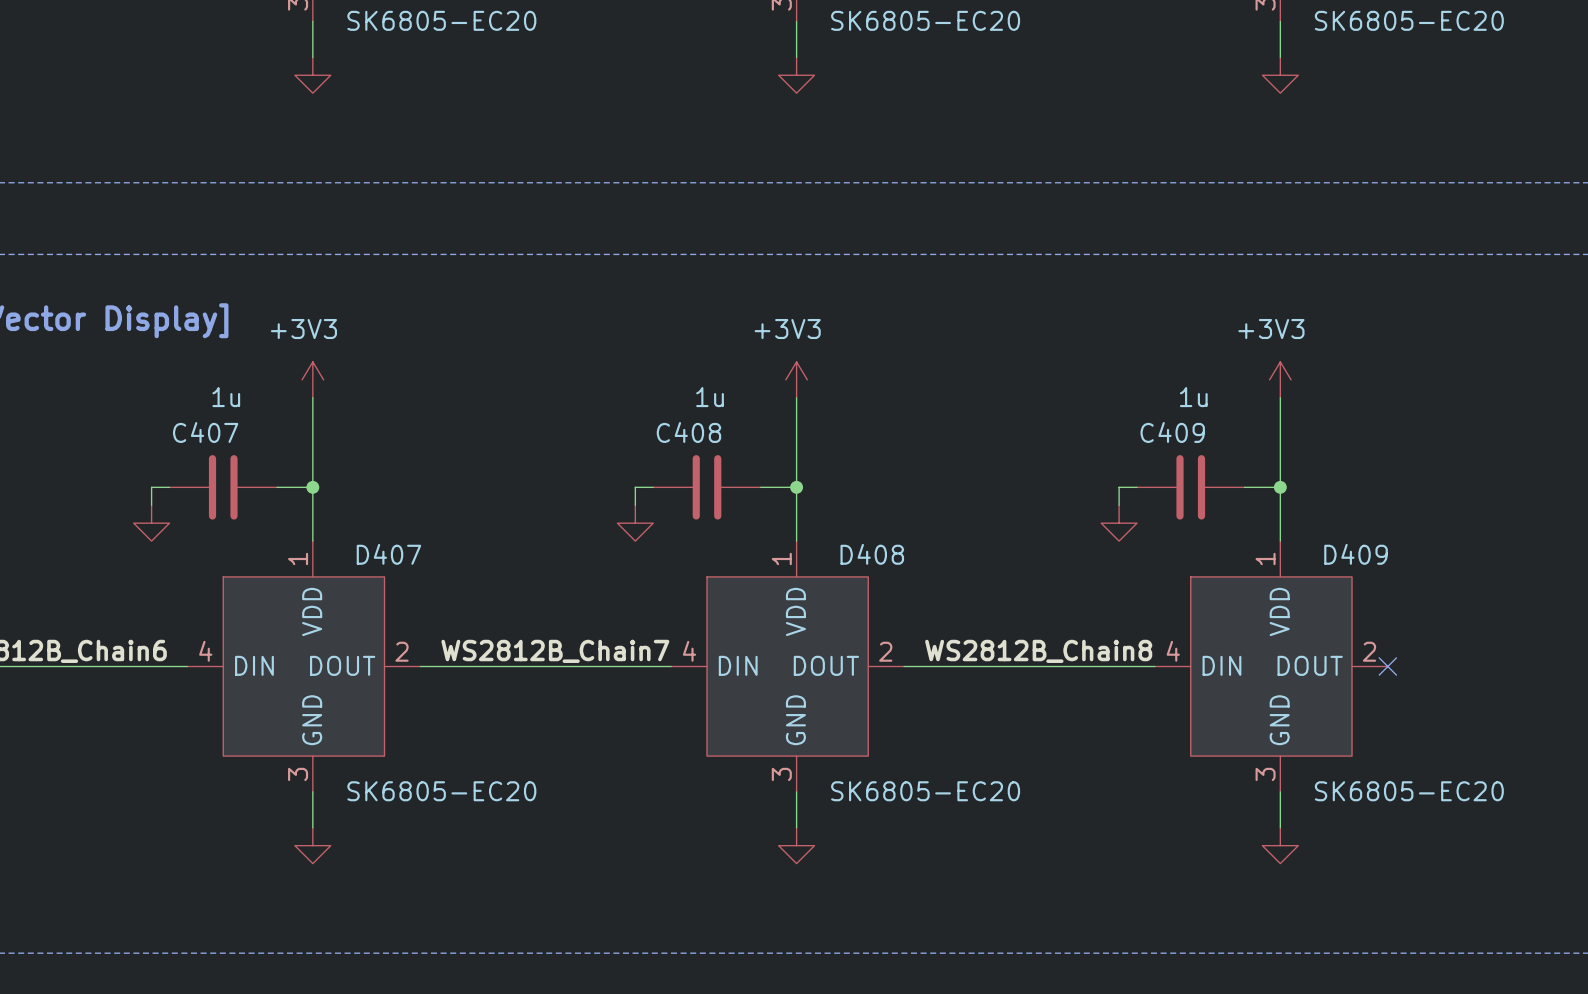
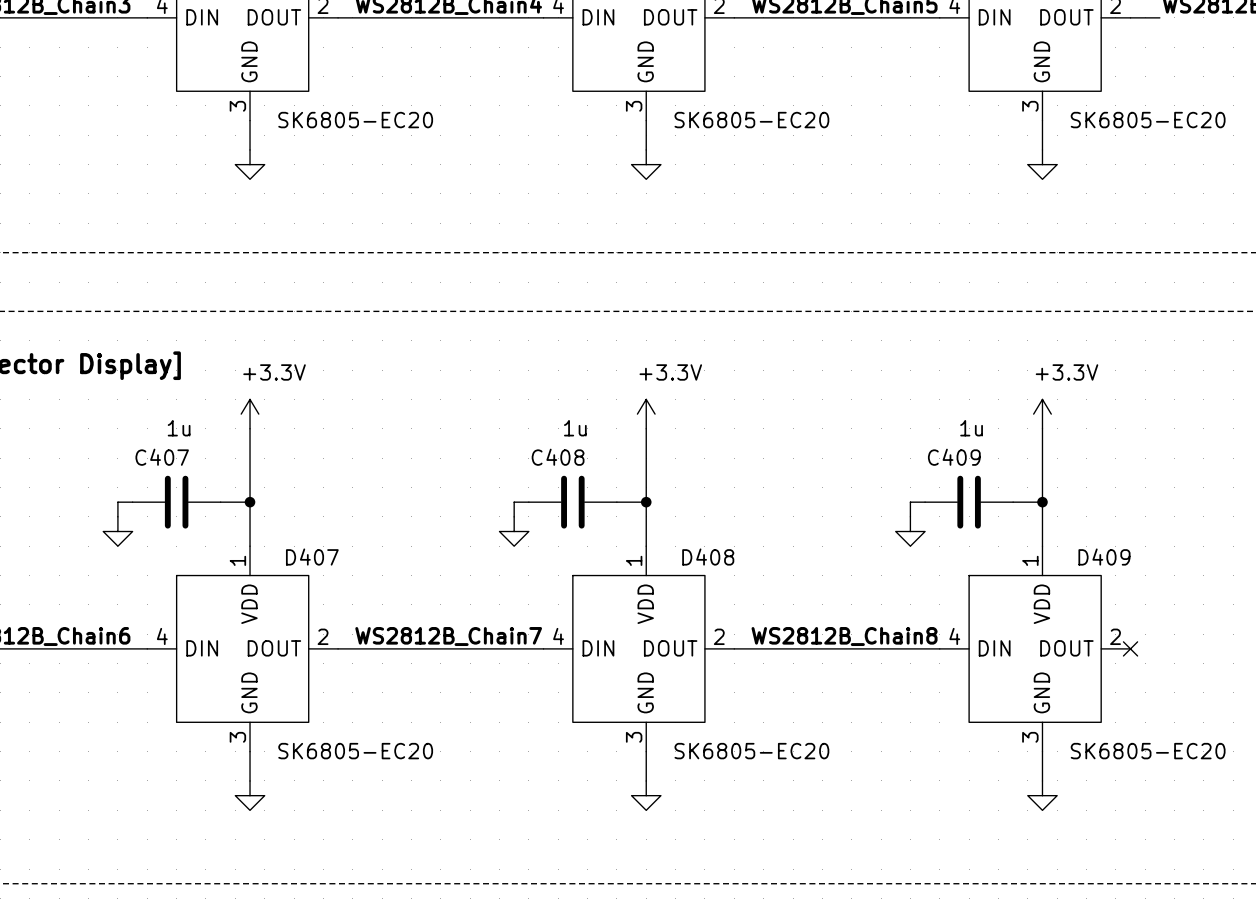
power symbol: +3V3 (312, 379) -> +3.3V (250, 414)
power symbol: +3V3 (796, 379) -> +3.3V (646, 414)
power symbol: +3V3 (1280, 379) -> +3.3V (1042, 414)

